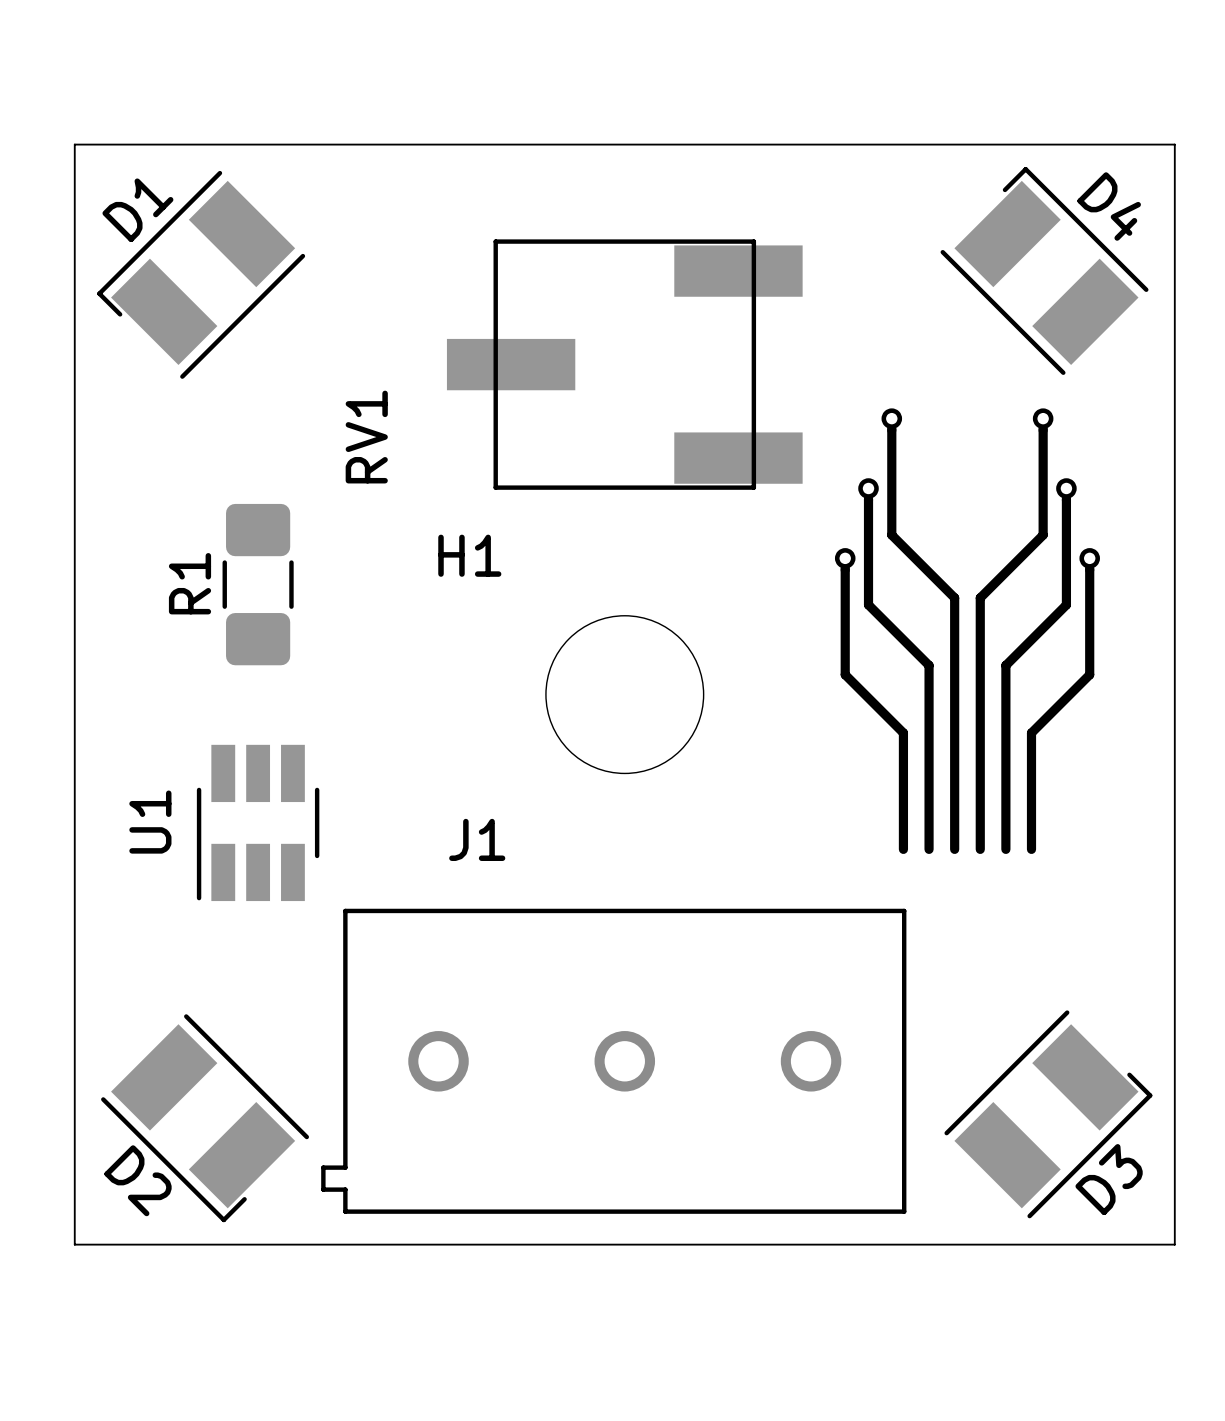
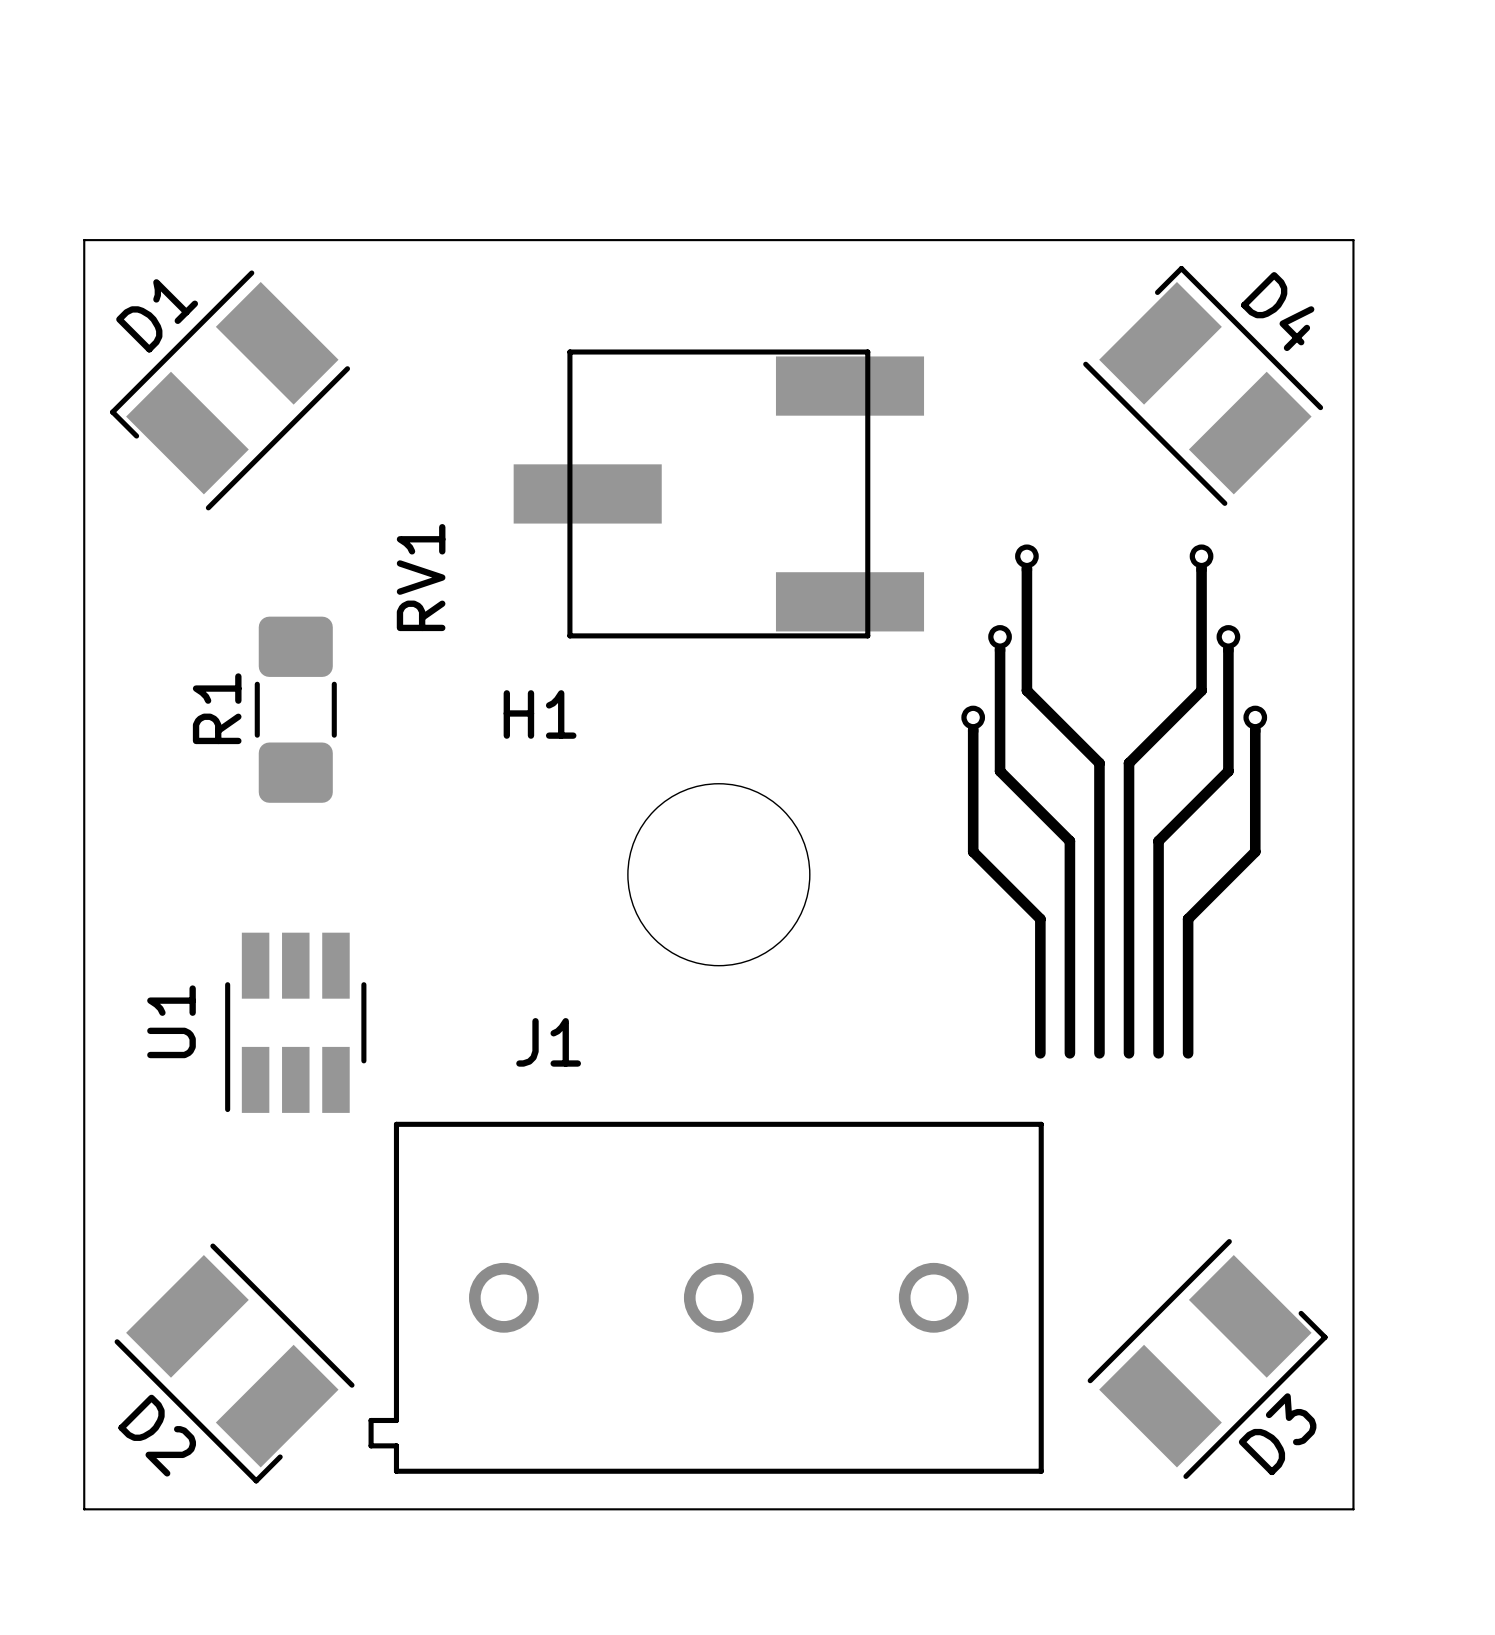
R1 position: (258, 584) -> (295, 709)

